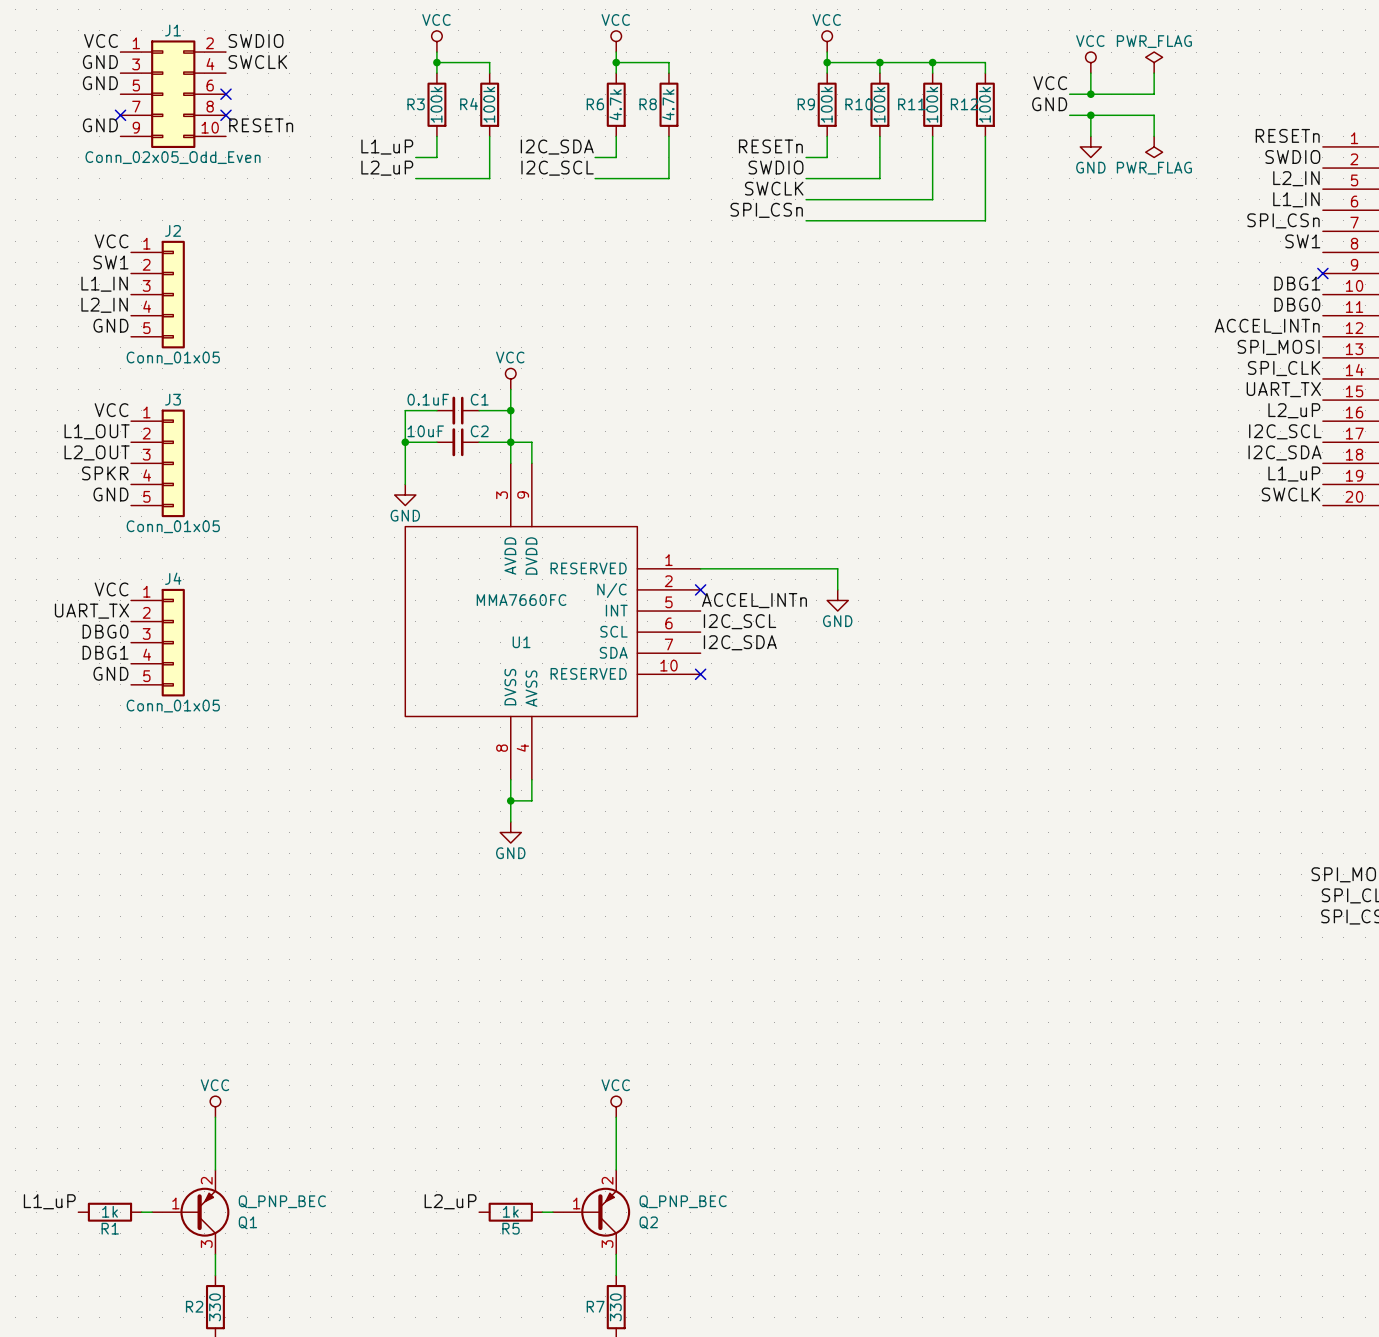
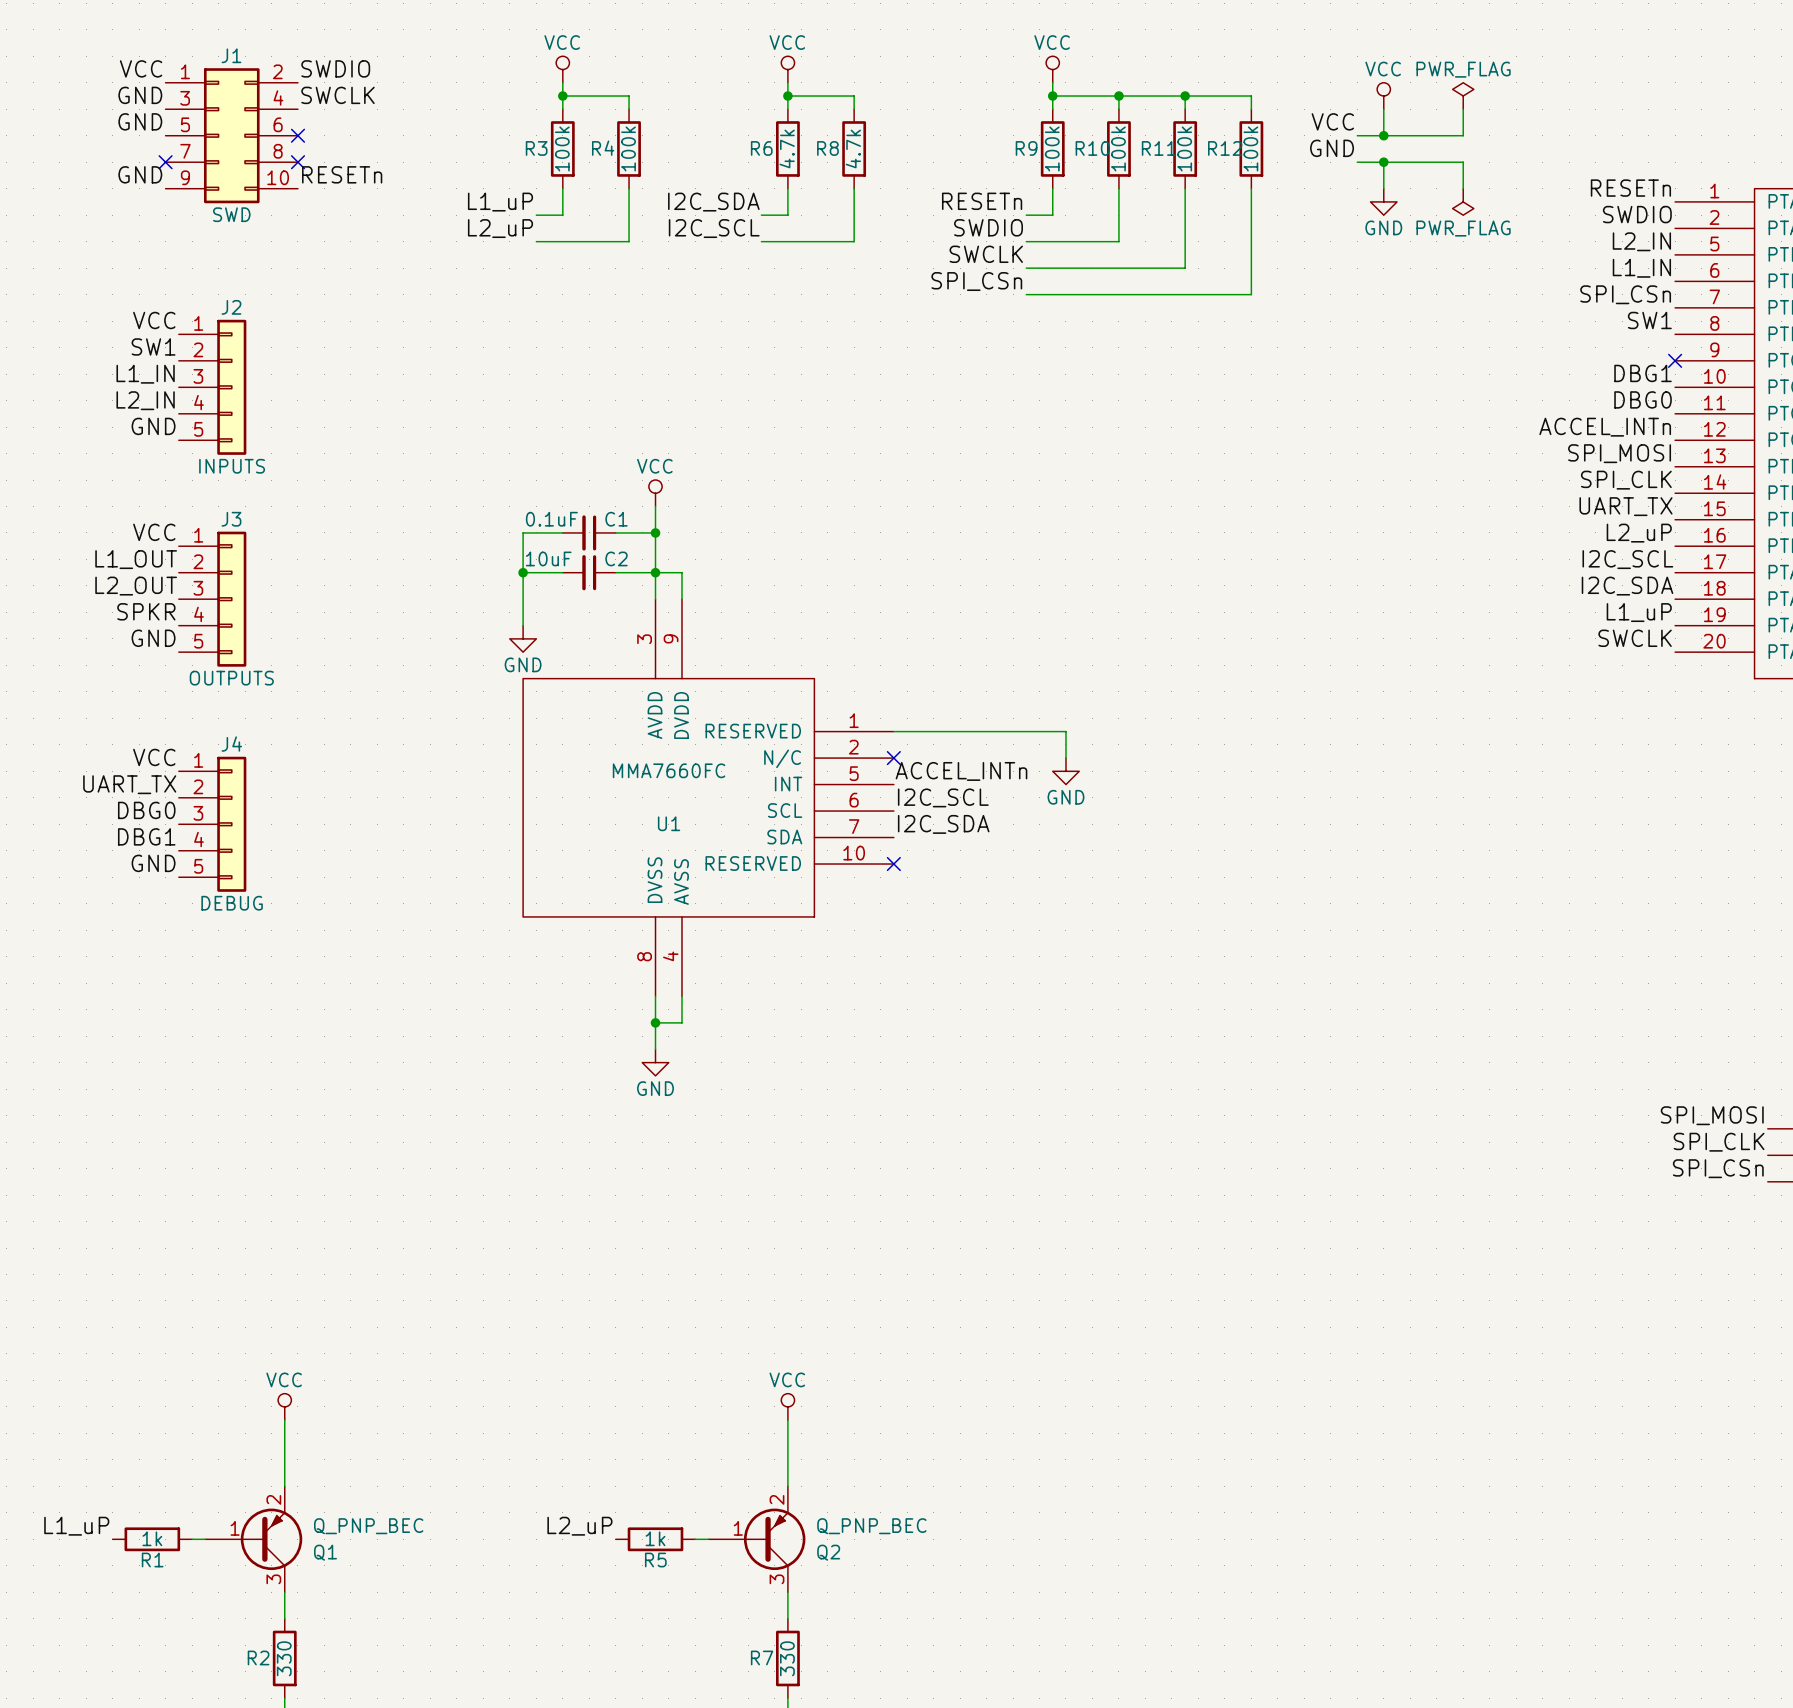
J1 value: Conn_02x05_Odd_Even (173, 157) -> SWD (231, 214)
J2 value: Conn_01x05 (173, 357) -> INPUTS (232, 466)
J3 value: Conn_01x05 (173, 526) -> OUTPUTS (231, 678)
J4 value: Conn_01x05 (173, 706) -> DEBUG (232, 903)

